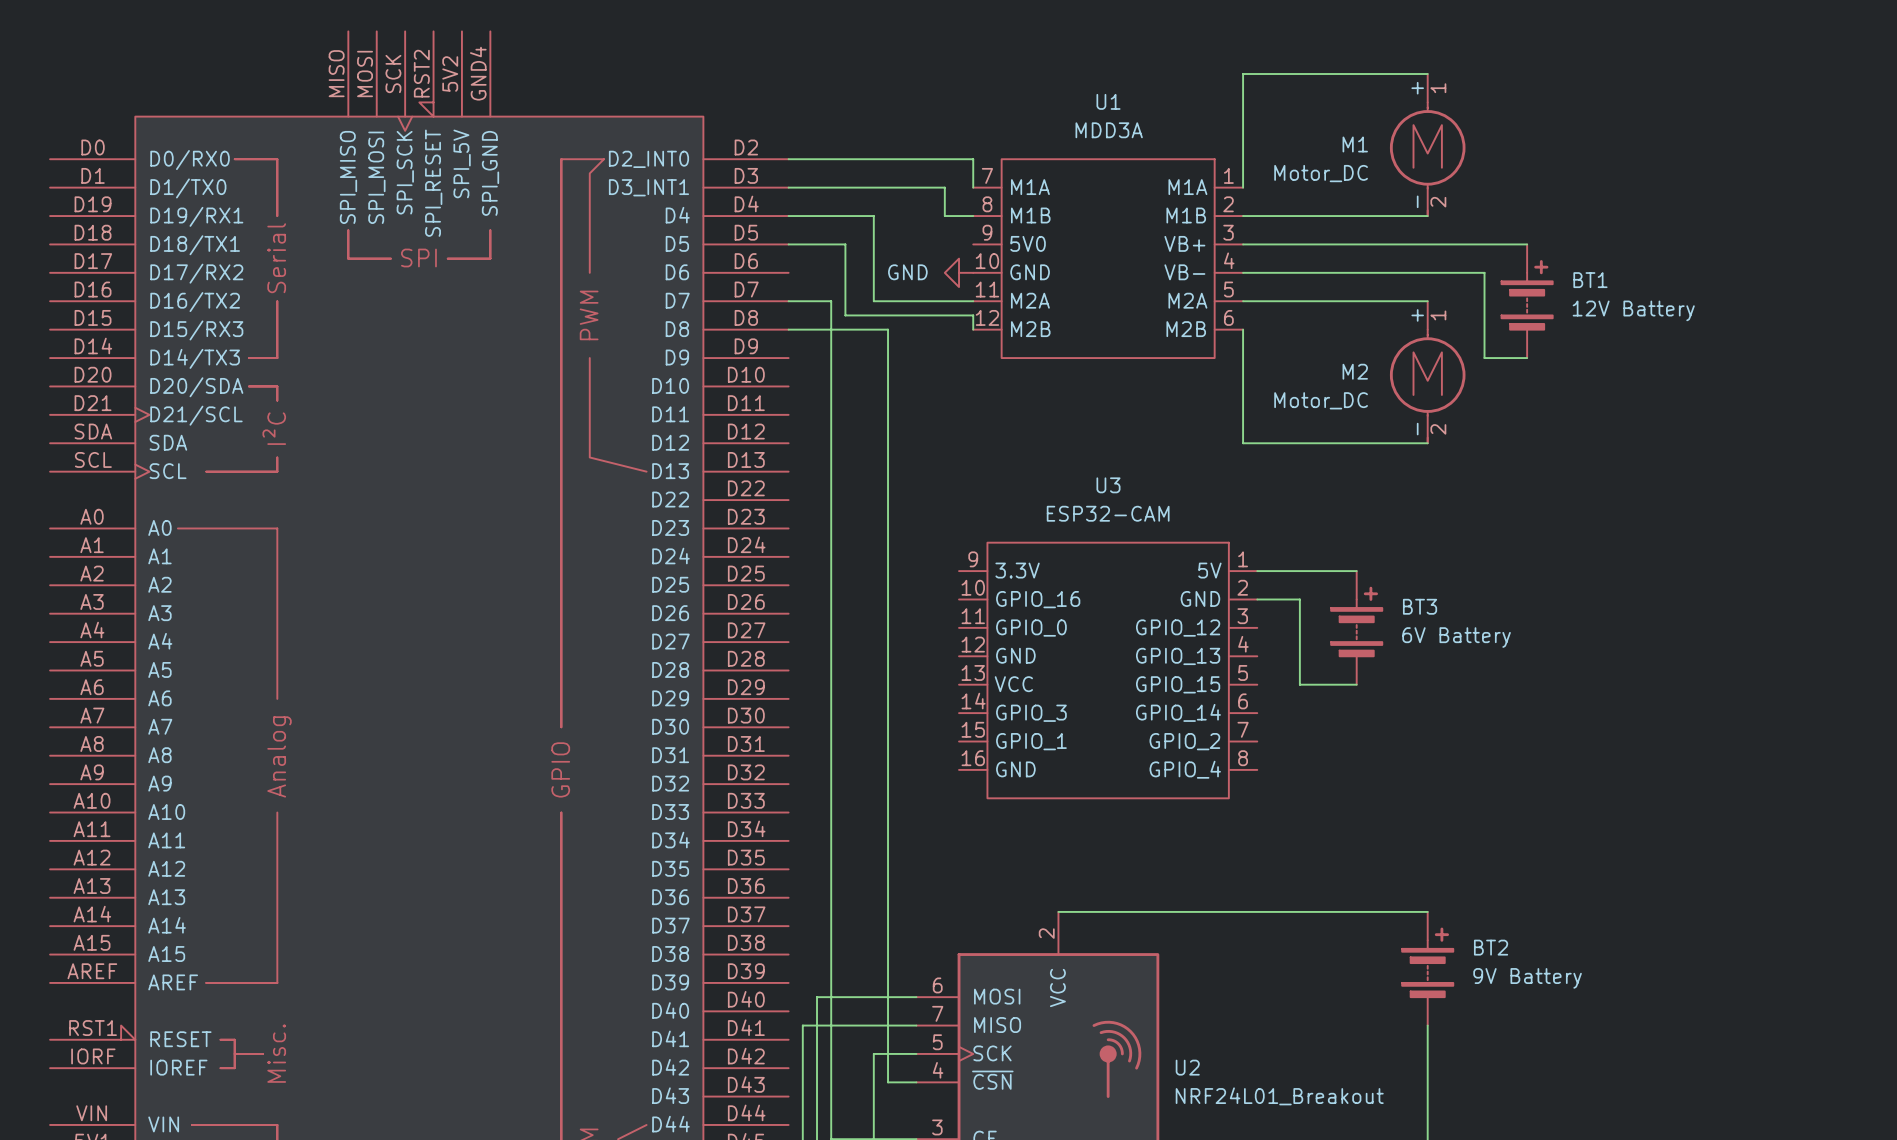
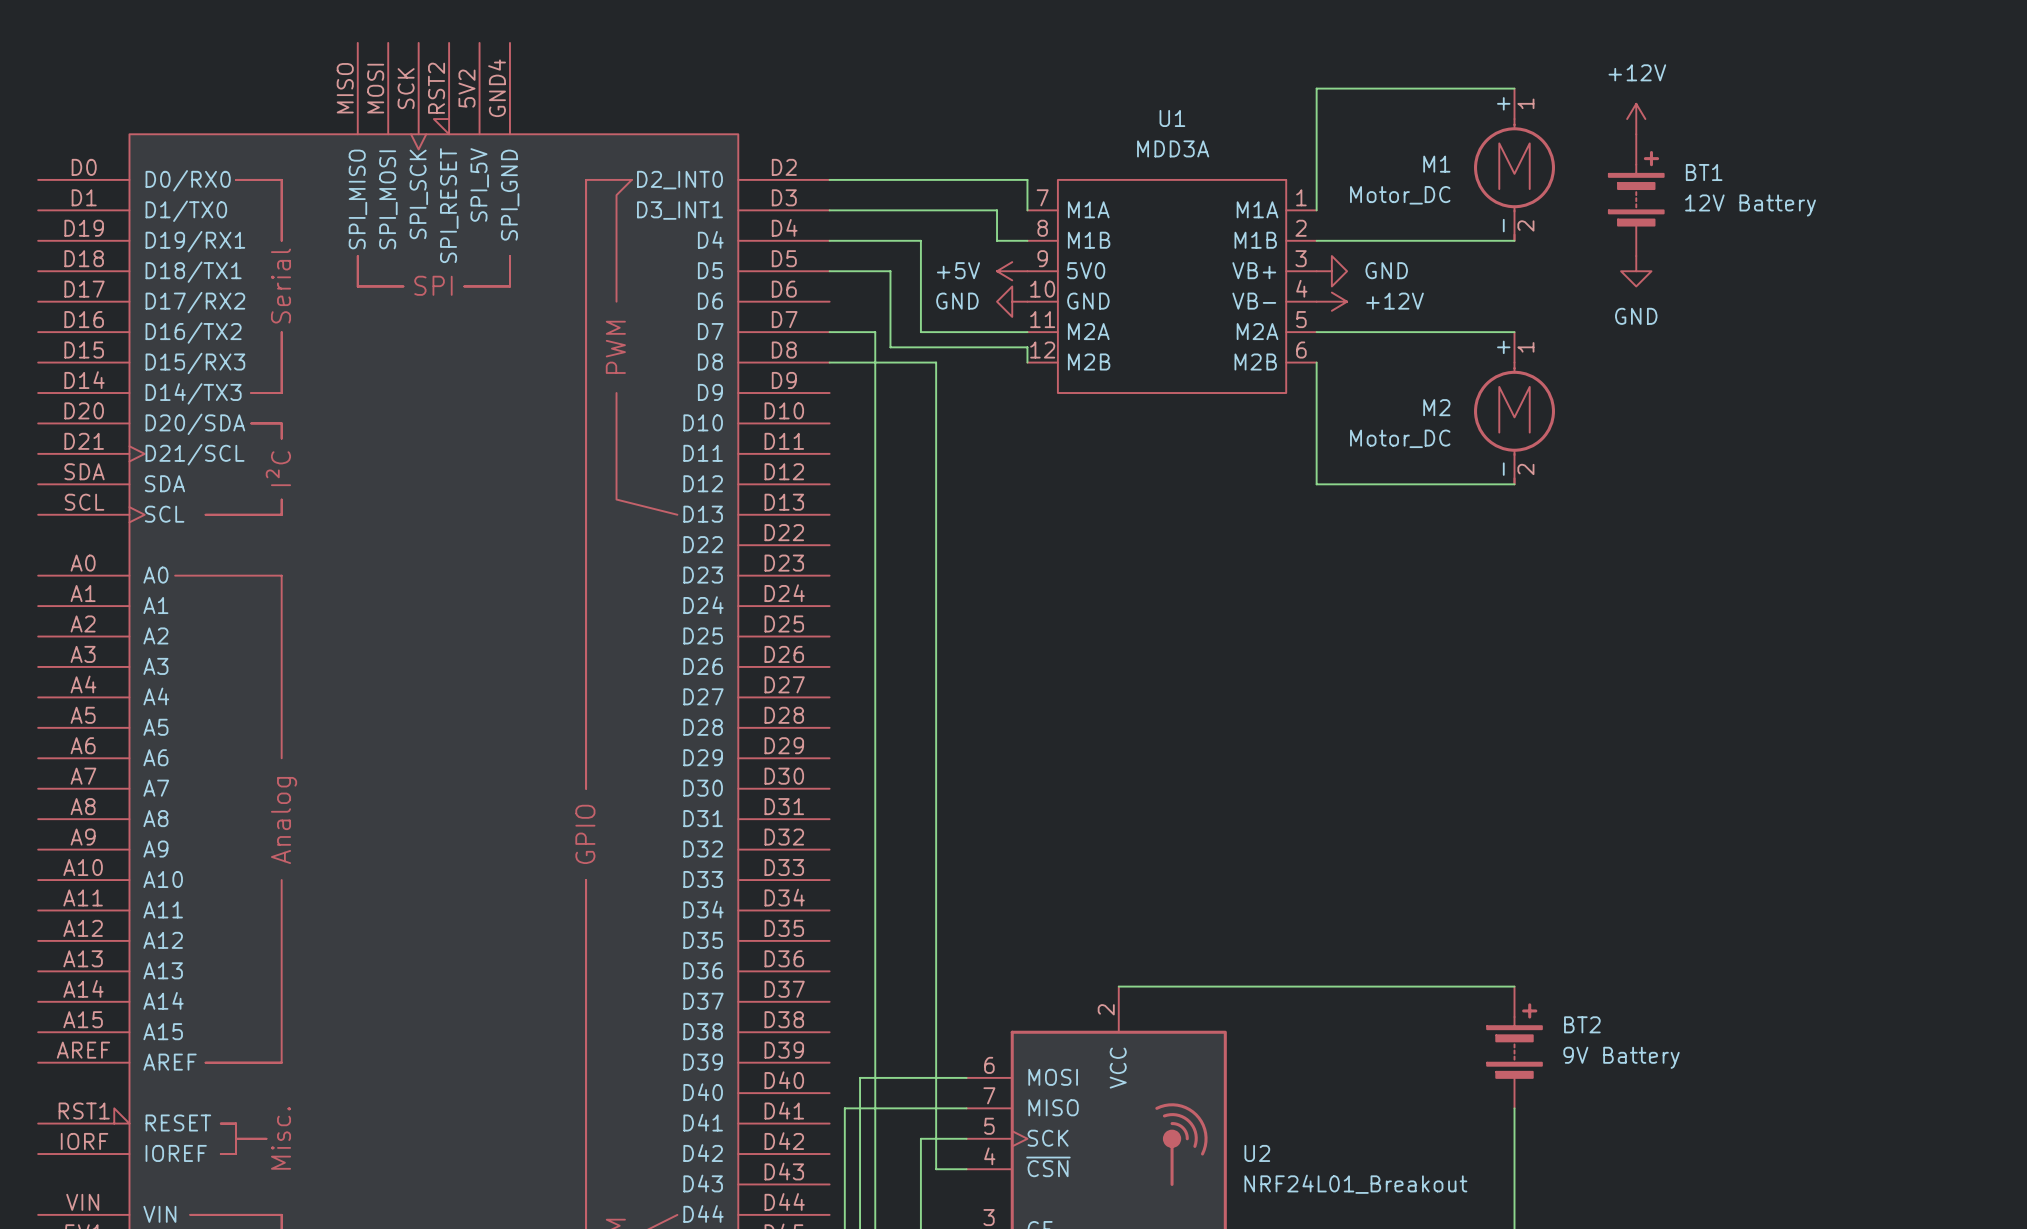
power symbol: none -> +12V (1636, 119)
power symbol: none -> +5V (1012, 271)
wire: (1243, 244) (1527, 244) -> none
power symbol: none -> GND (1331, 271)
power symbol: none -> GND (1636, 271)
wire: (1243, 272) (1484, 272) (1484, 358) (1527, 358) -> none
power symbol: none -> +12V (1331, 301)
BT1 position: (1527, 301) -> (1636, 195)
wire: (1257, 571) (1356, 571) -> none
wire: (1257, 599) (1299, 599) (1299, 684) (1356, 684) -> none
BT3: 6V Battery (1356, 627) -> none
U3: ESP32-CAM (1108, 670) -> none

